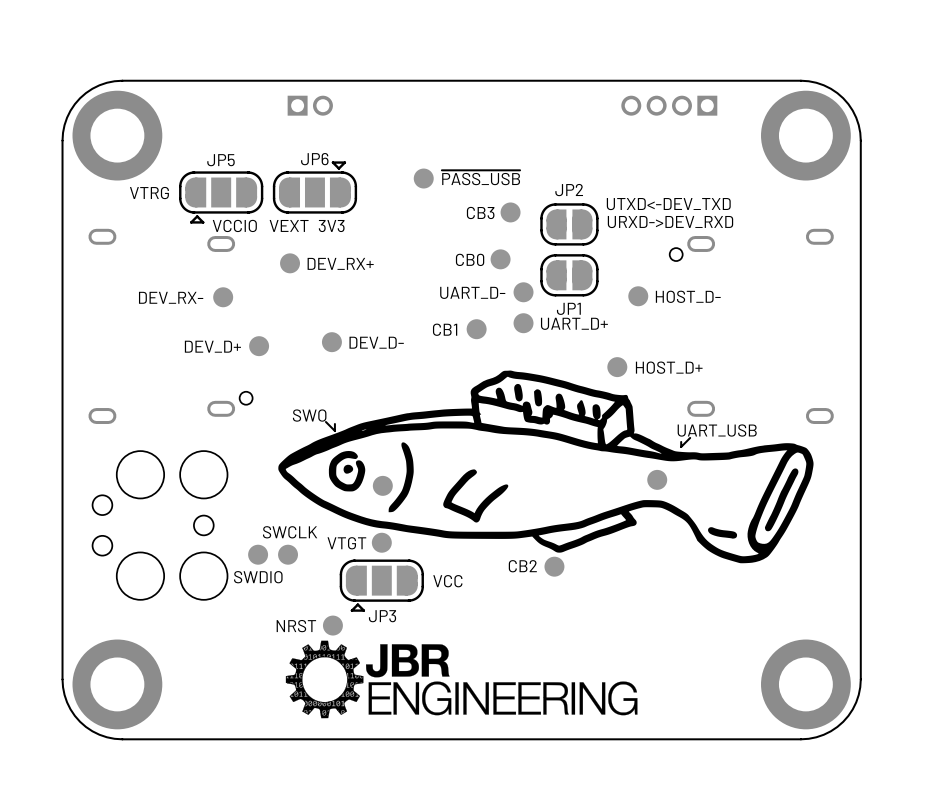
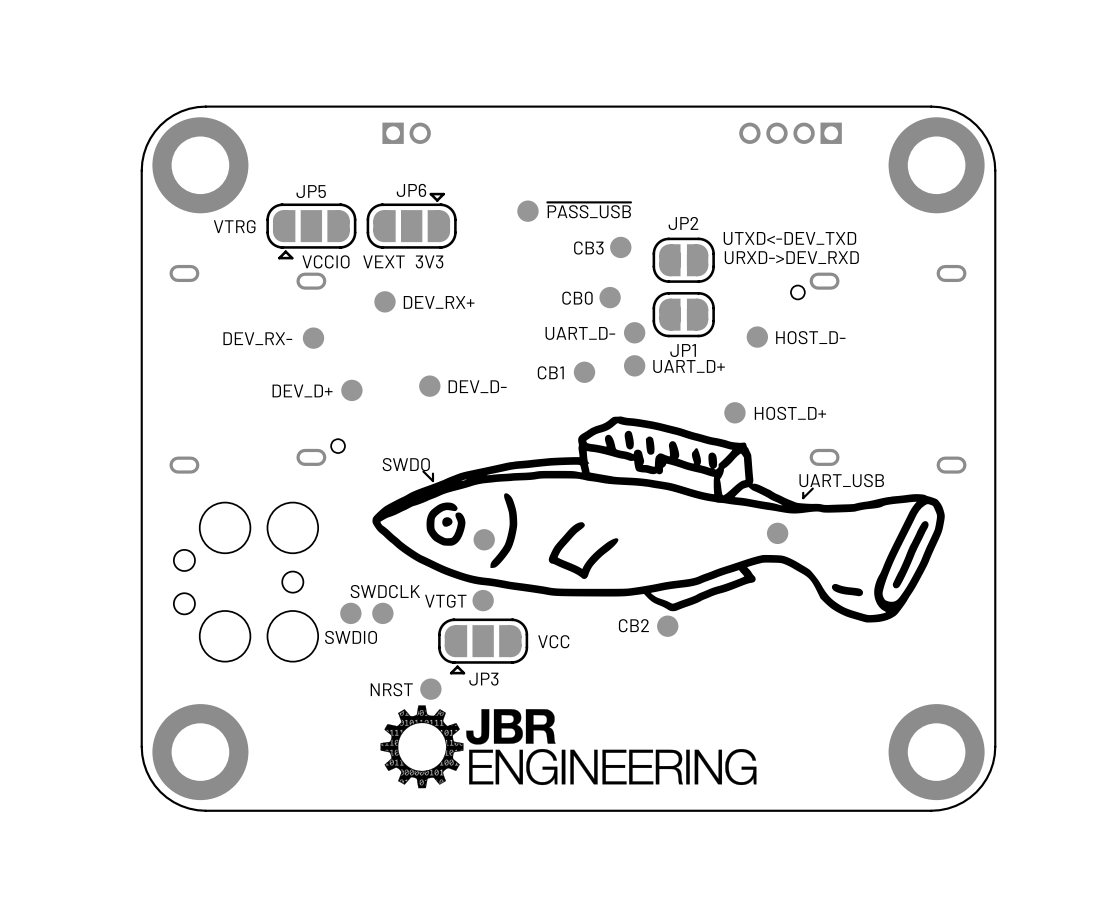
text: SWO (309, 415) -> SWDO (406, 464)
text: SWCLK (290, 532) -> SWDCLK (385, 591)

